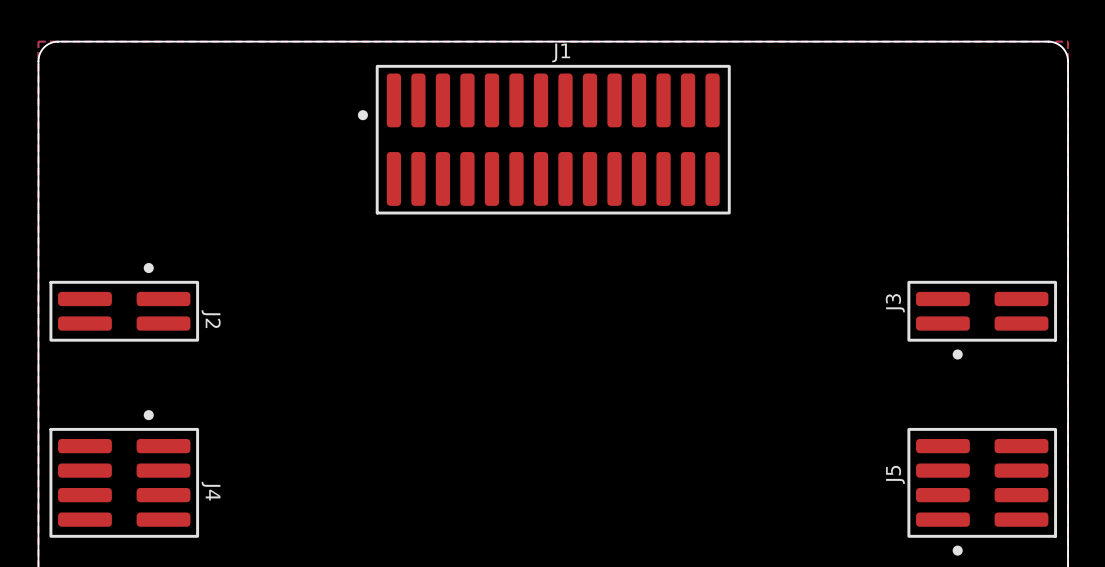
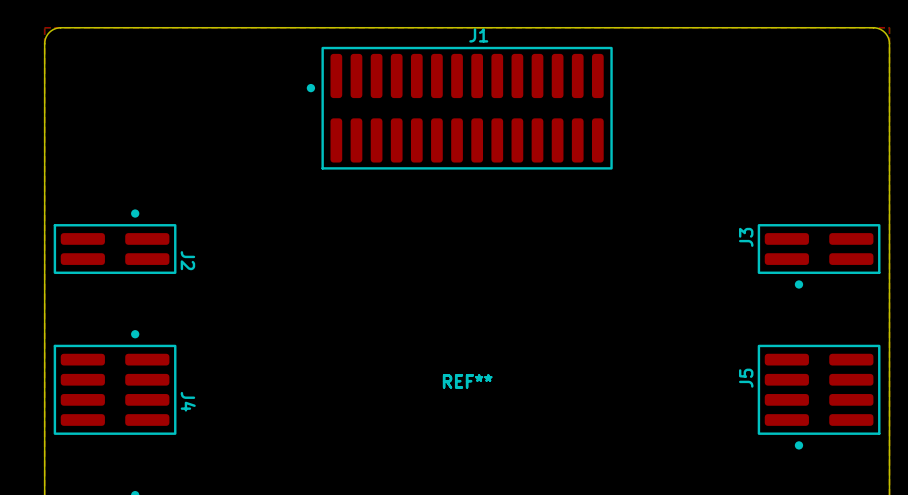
REF**: none -> (467, 381)

